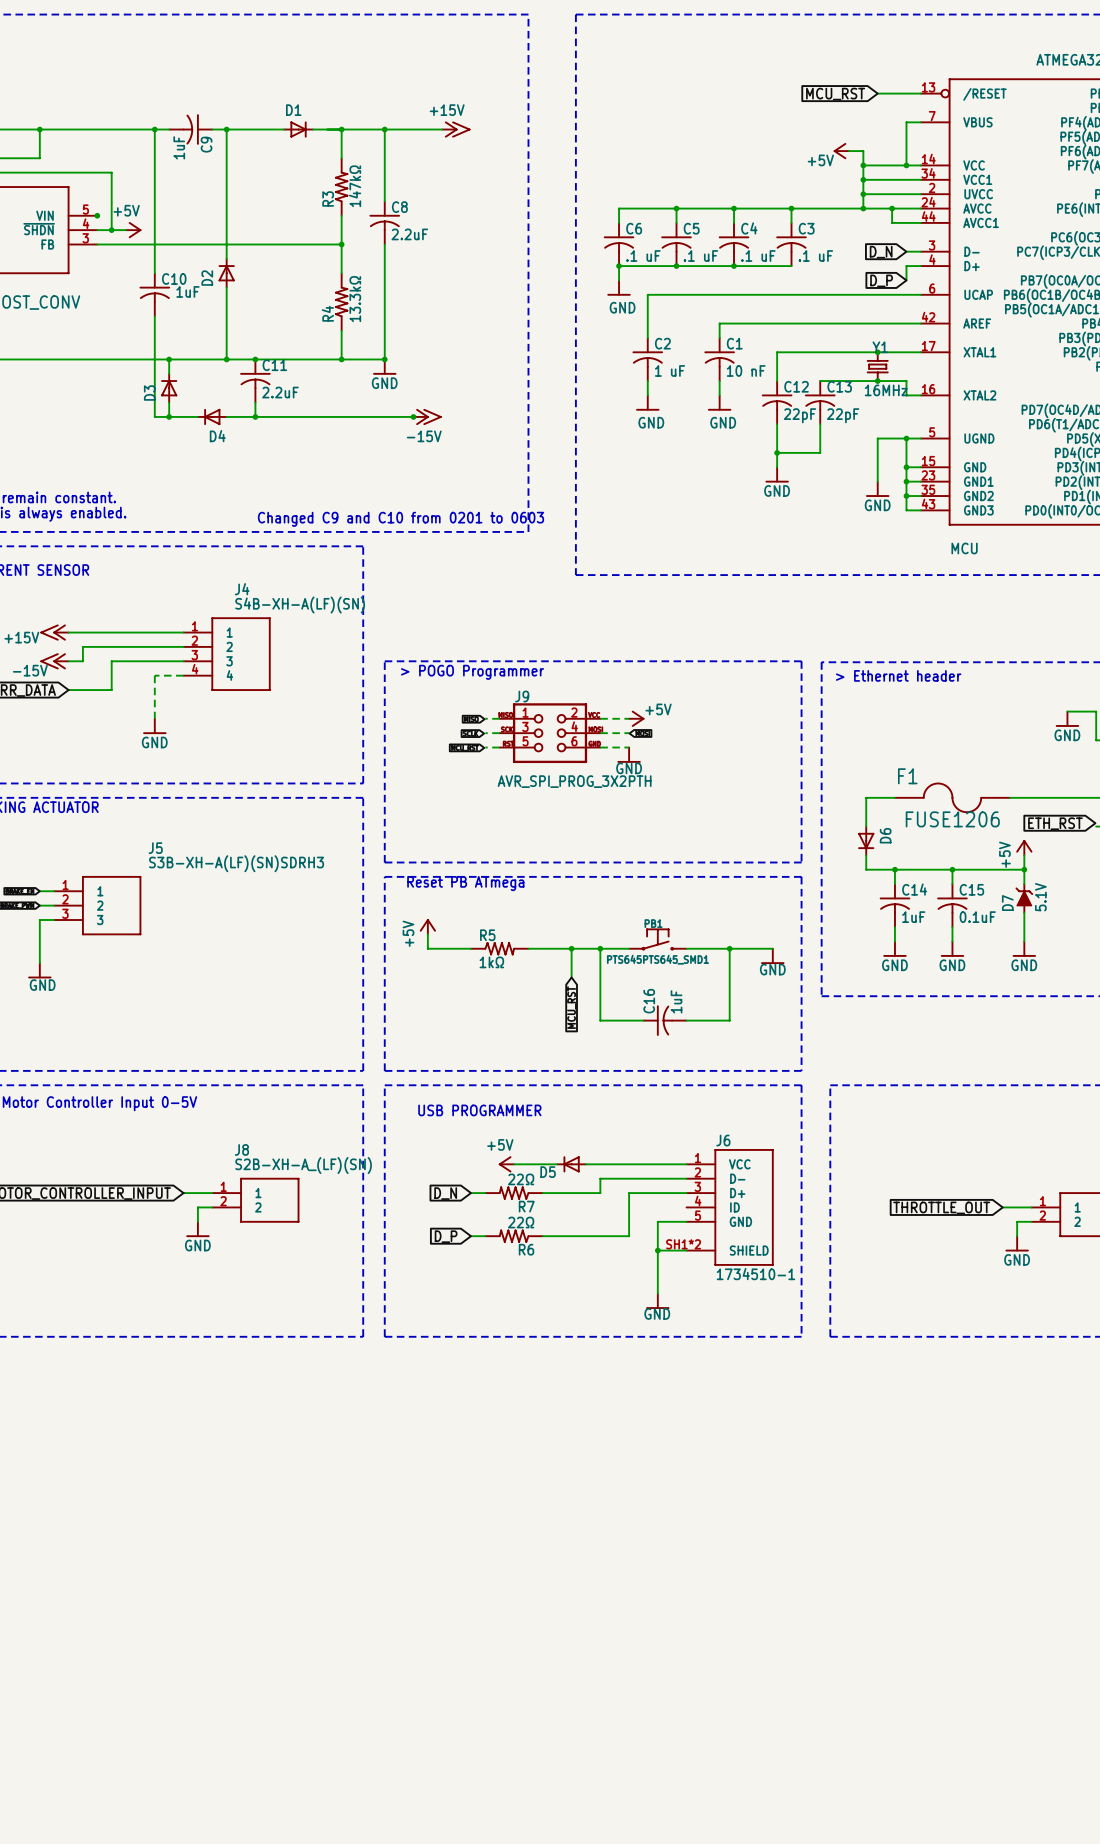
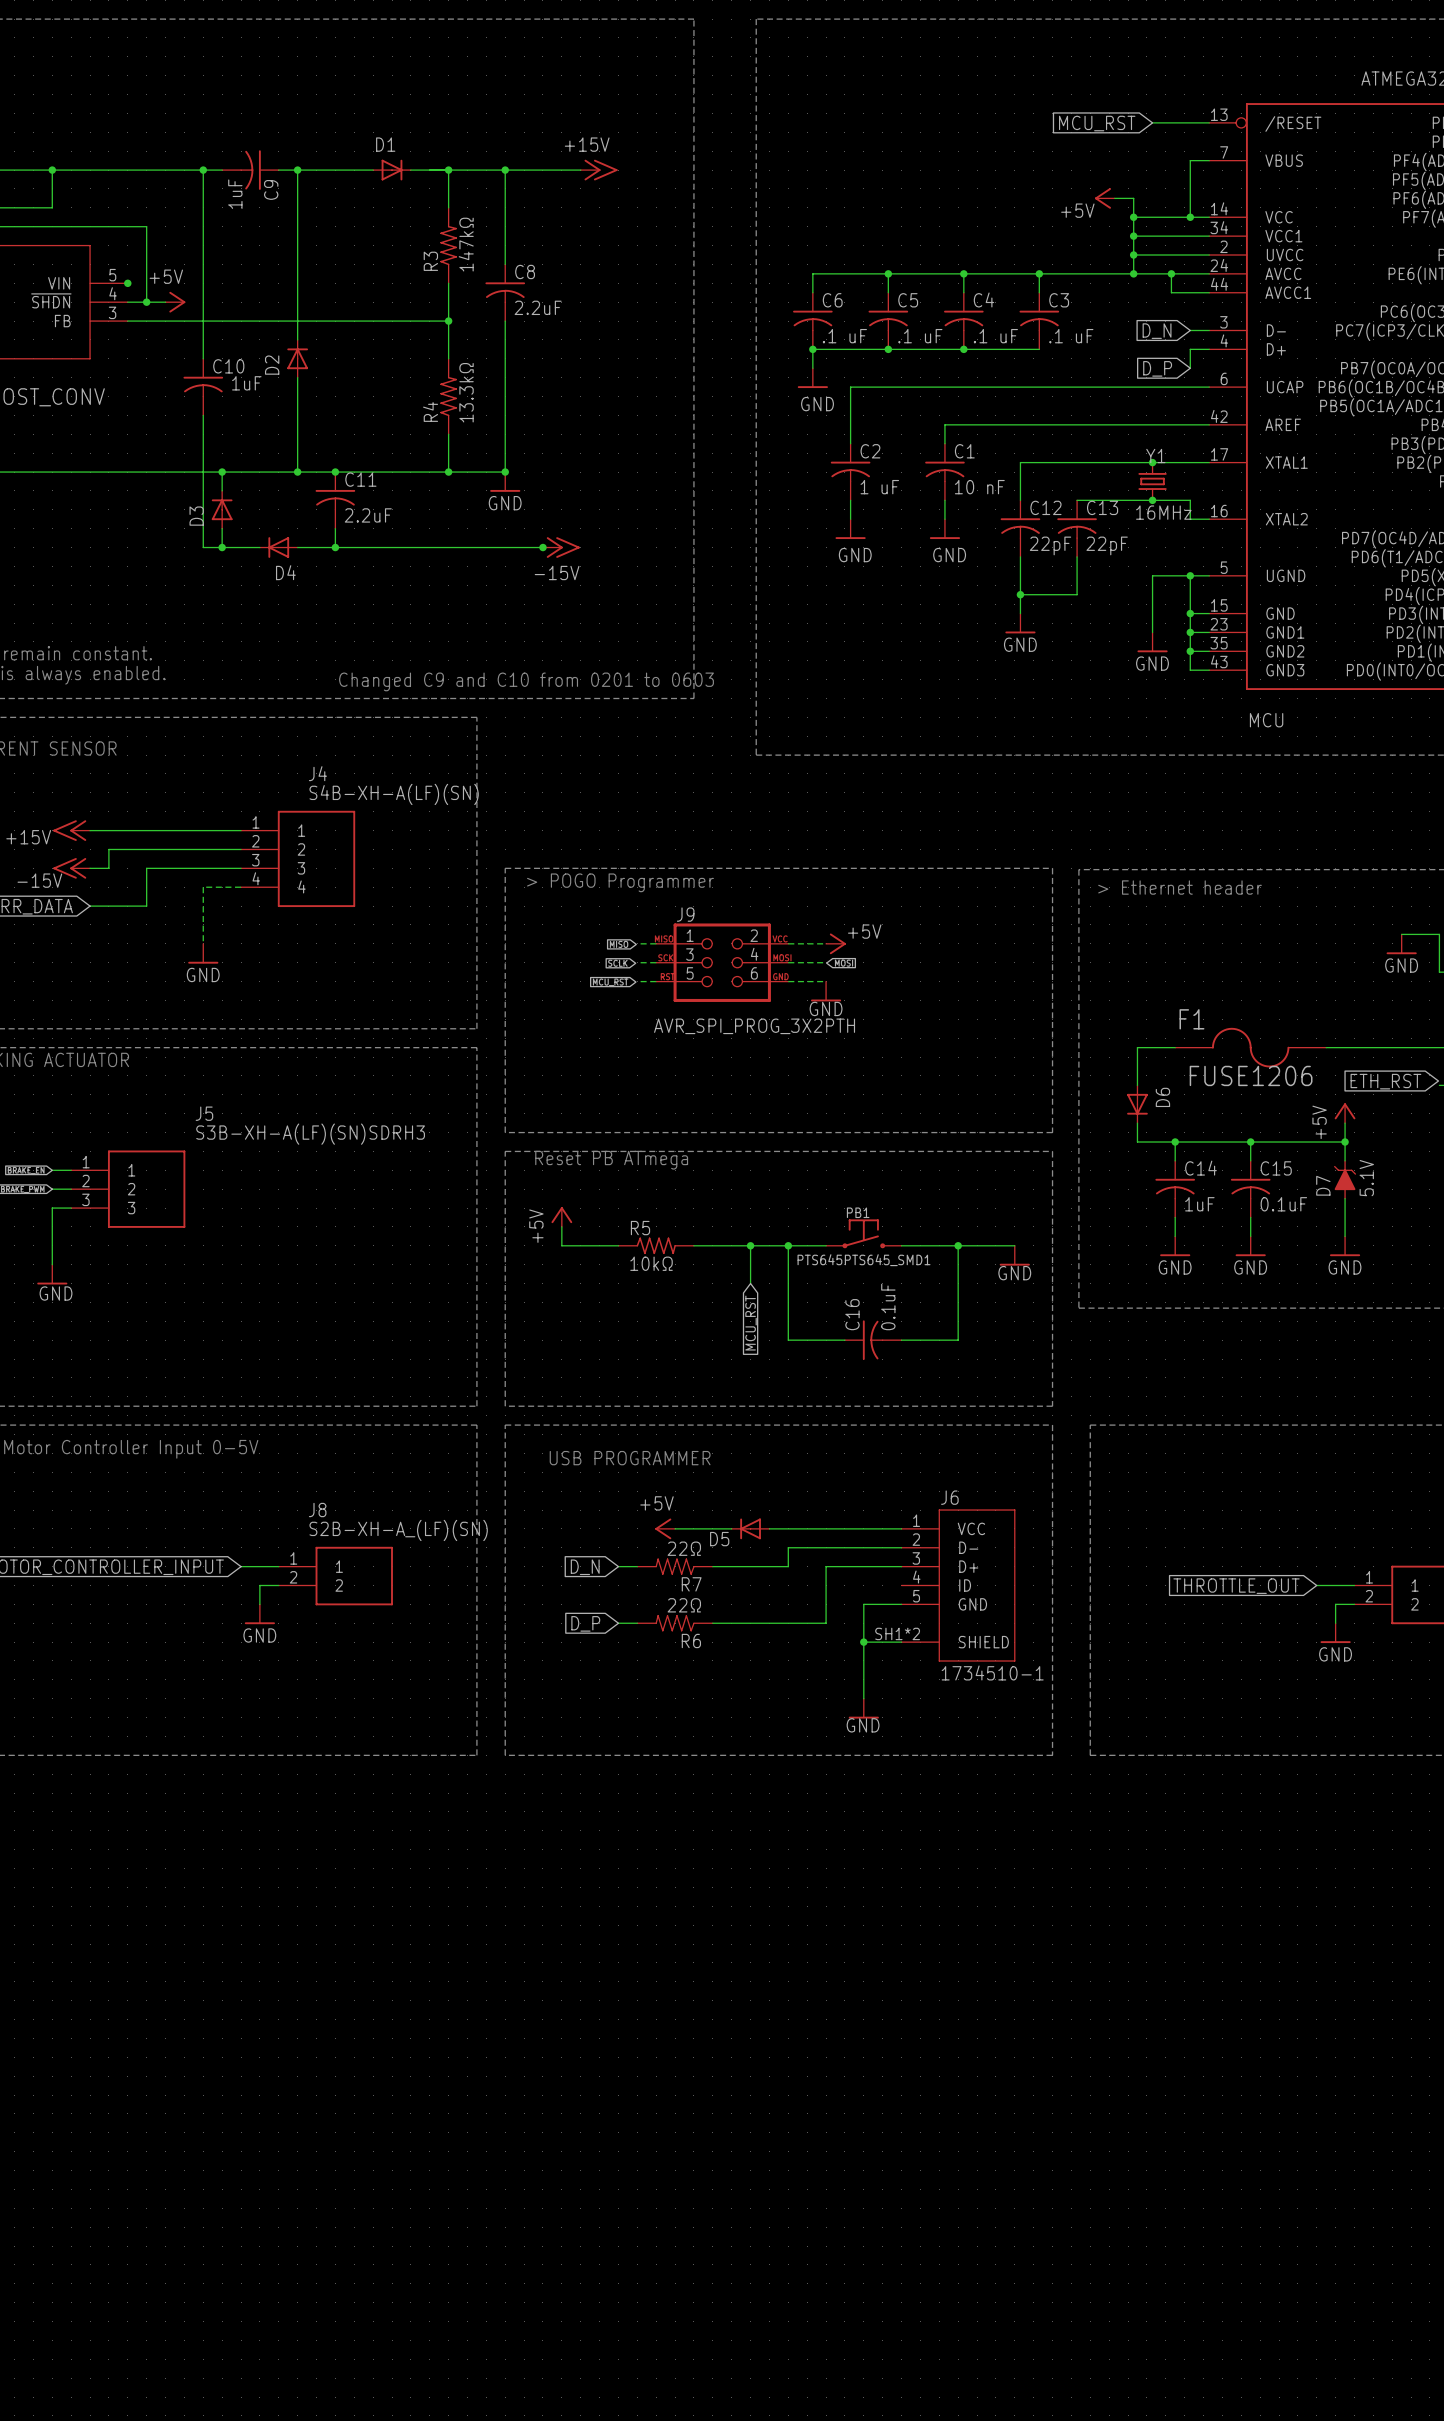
R5 value: 1kΩ (491, 962) -> 10kΩ (651, 1263)
C16 value: 1uF (676, 1001) -> 0.1uF (888, 1307)

